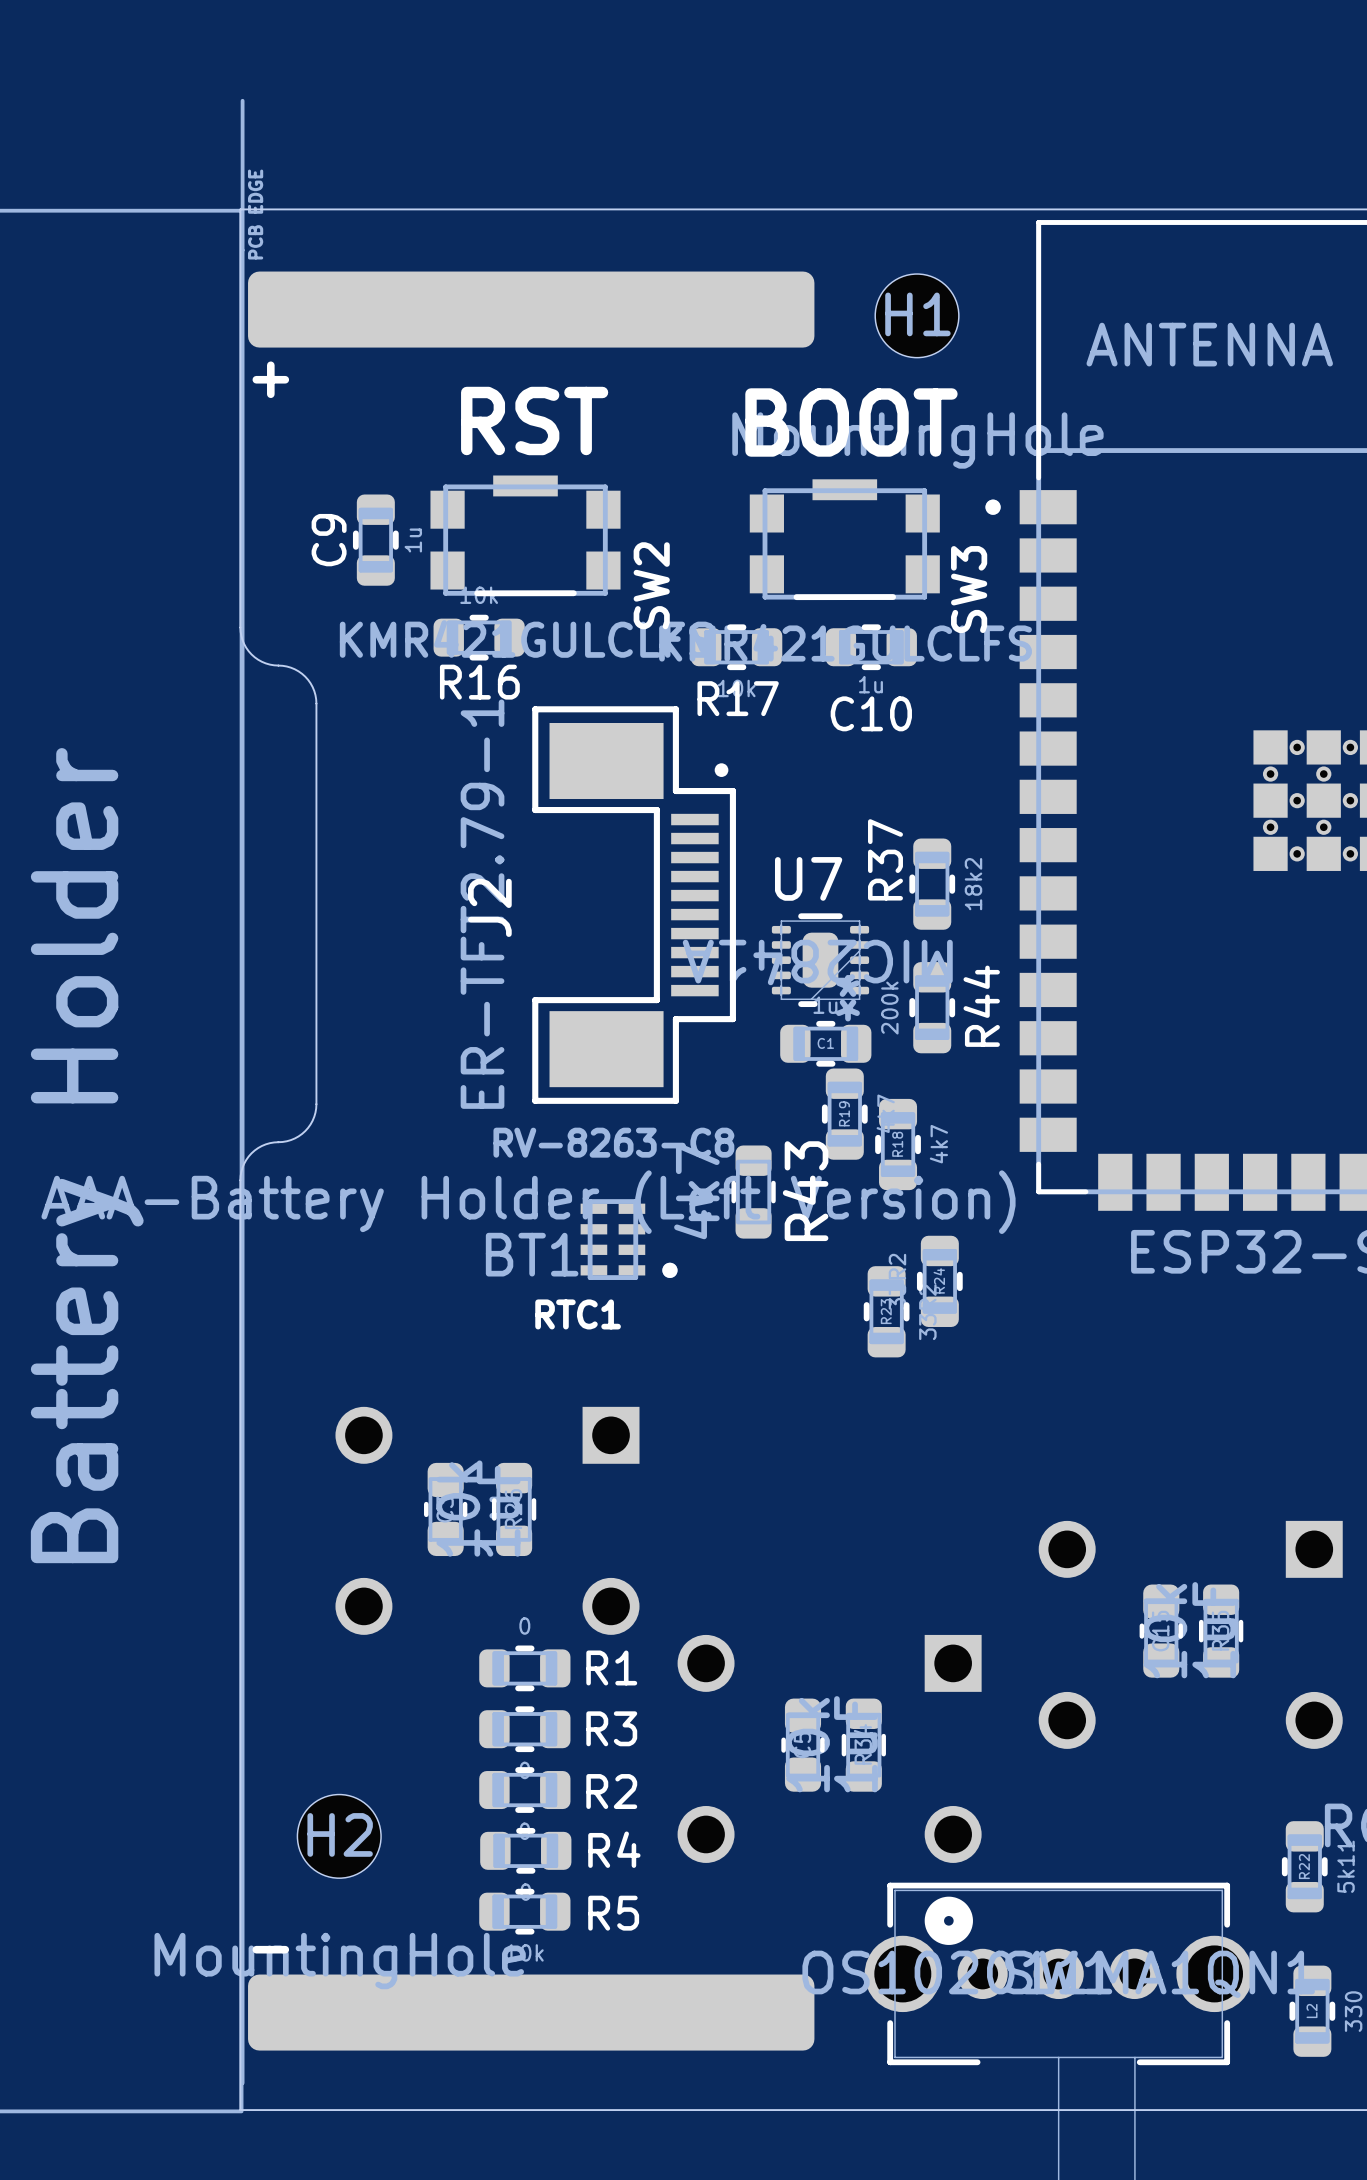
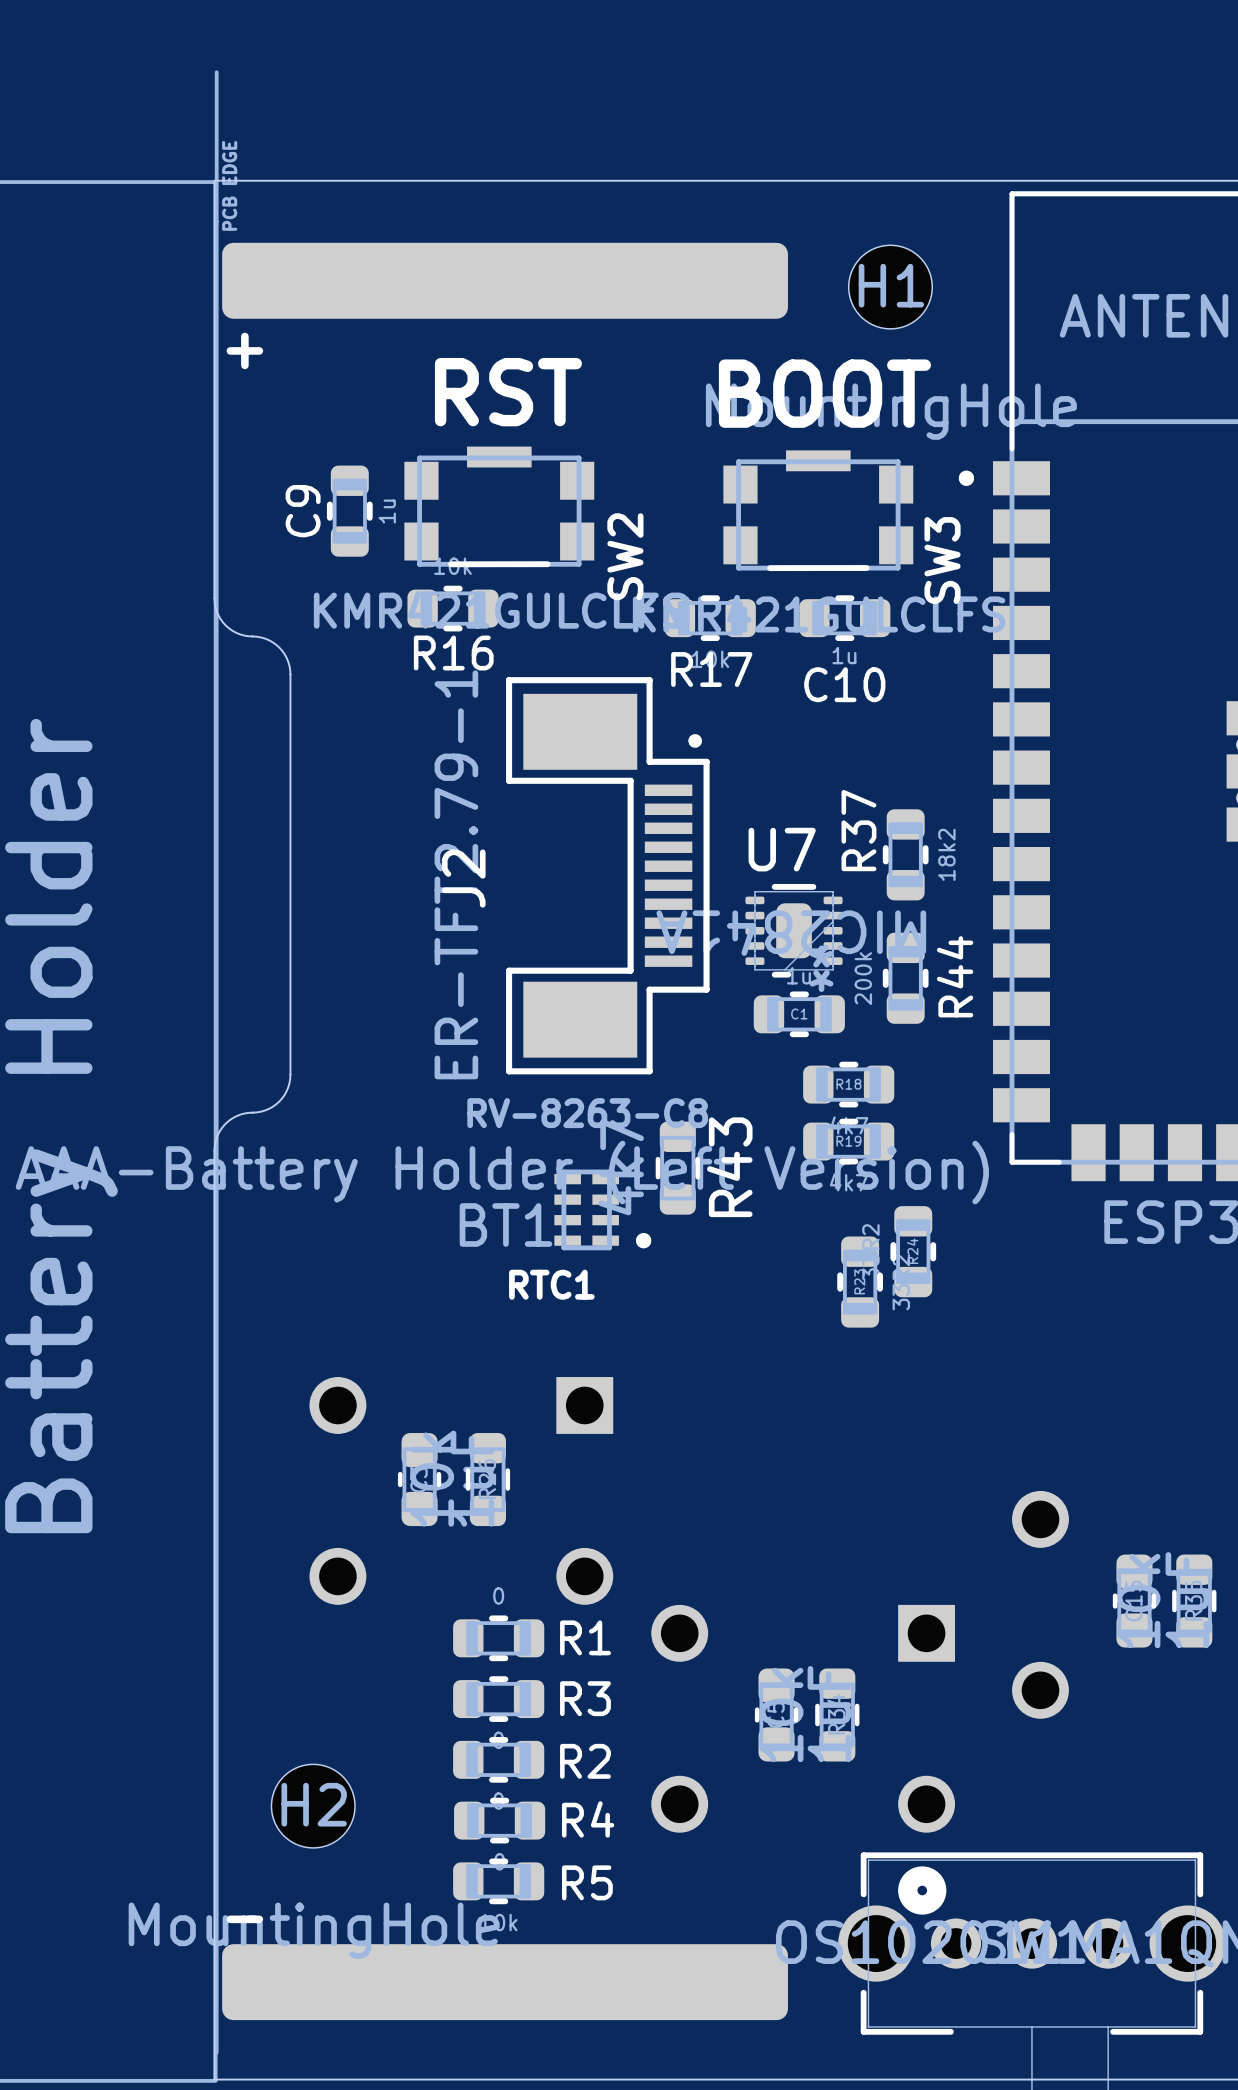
R19 rotation: 0° (844, 1114) -> 90° clockwise (848, 1141)
R19 position: (844, 1114) -> (848, 1141)
R18 rotation: 0° (898, 1144) -> 90° clockwise (848, 1084)
R43 position: (753, 1192) -> (677, 1168)

